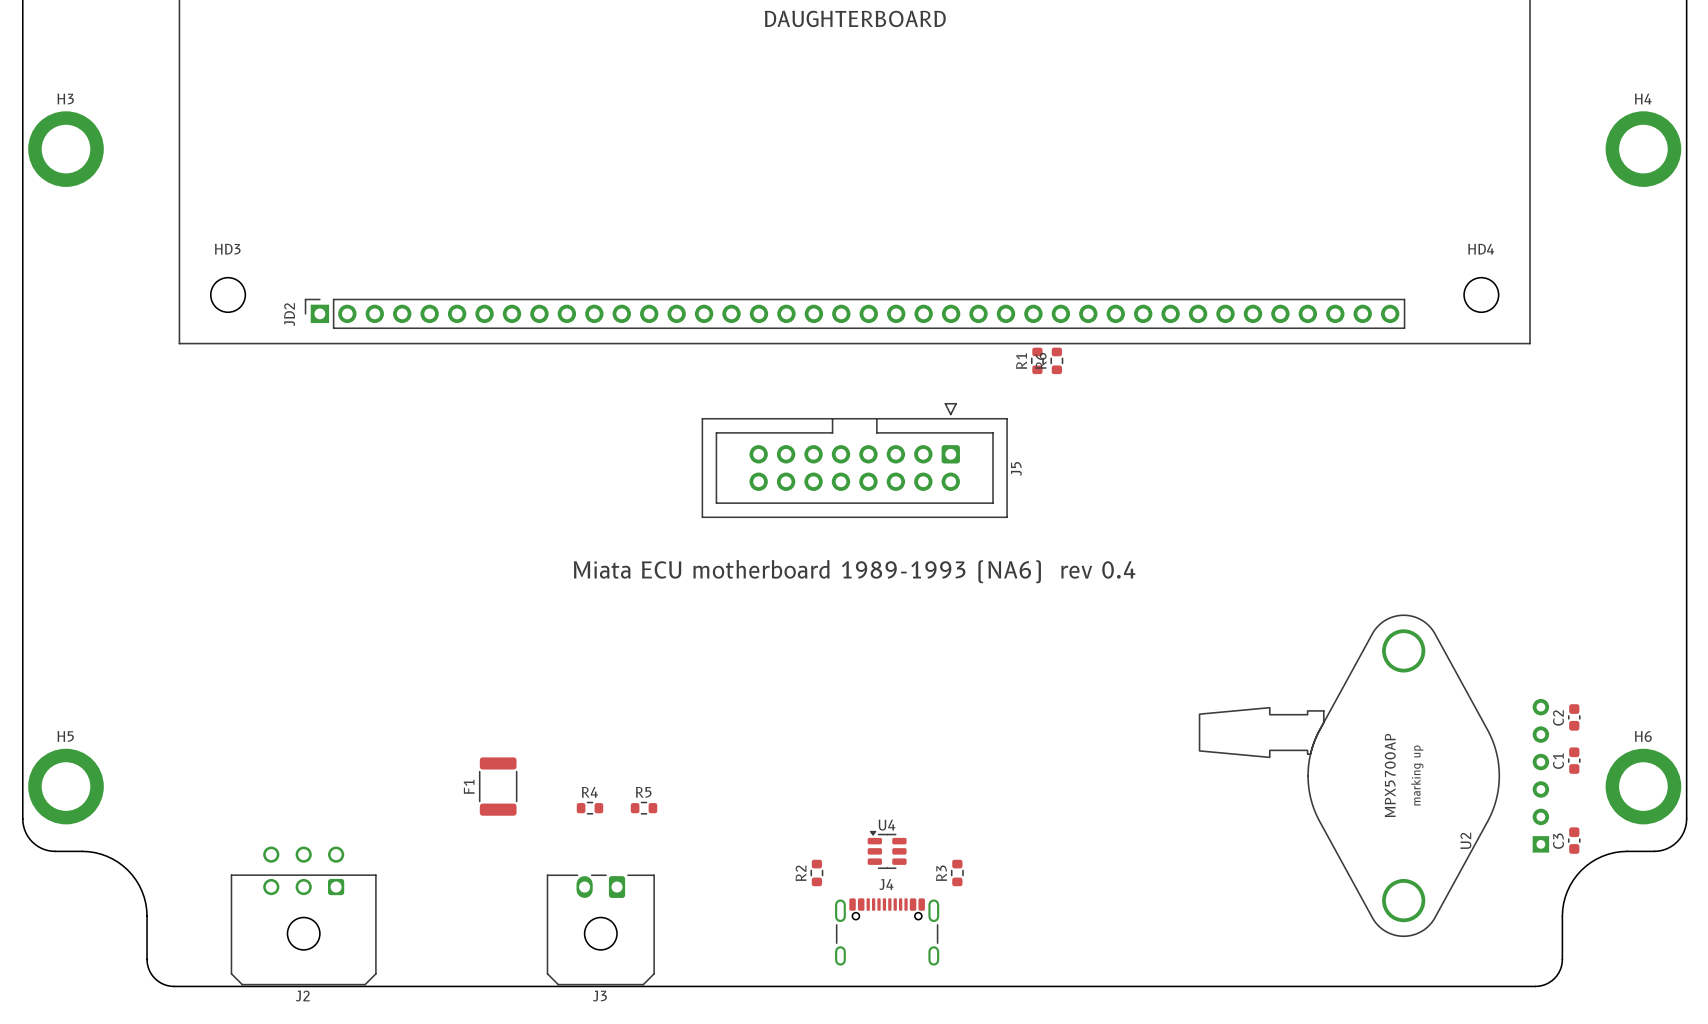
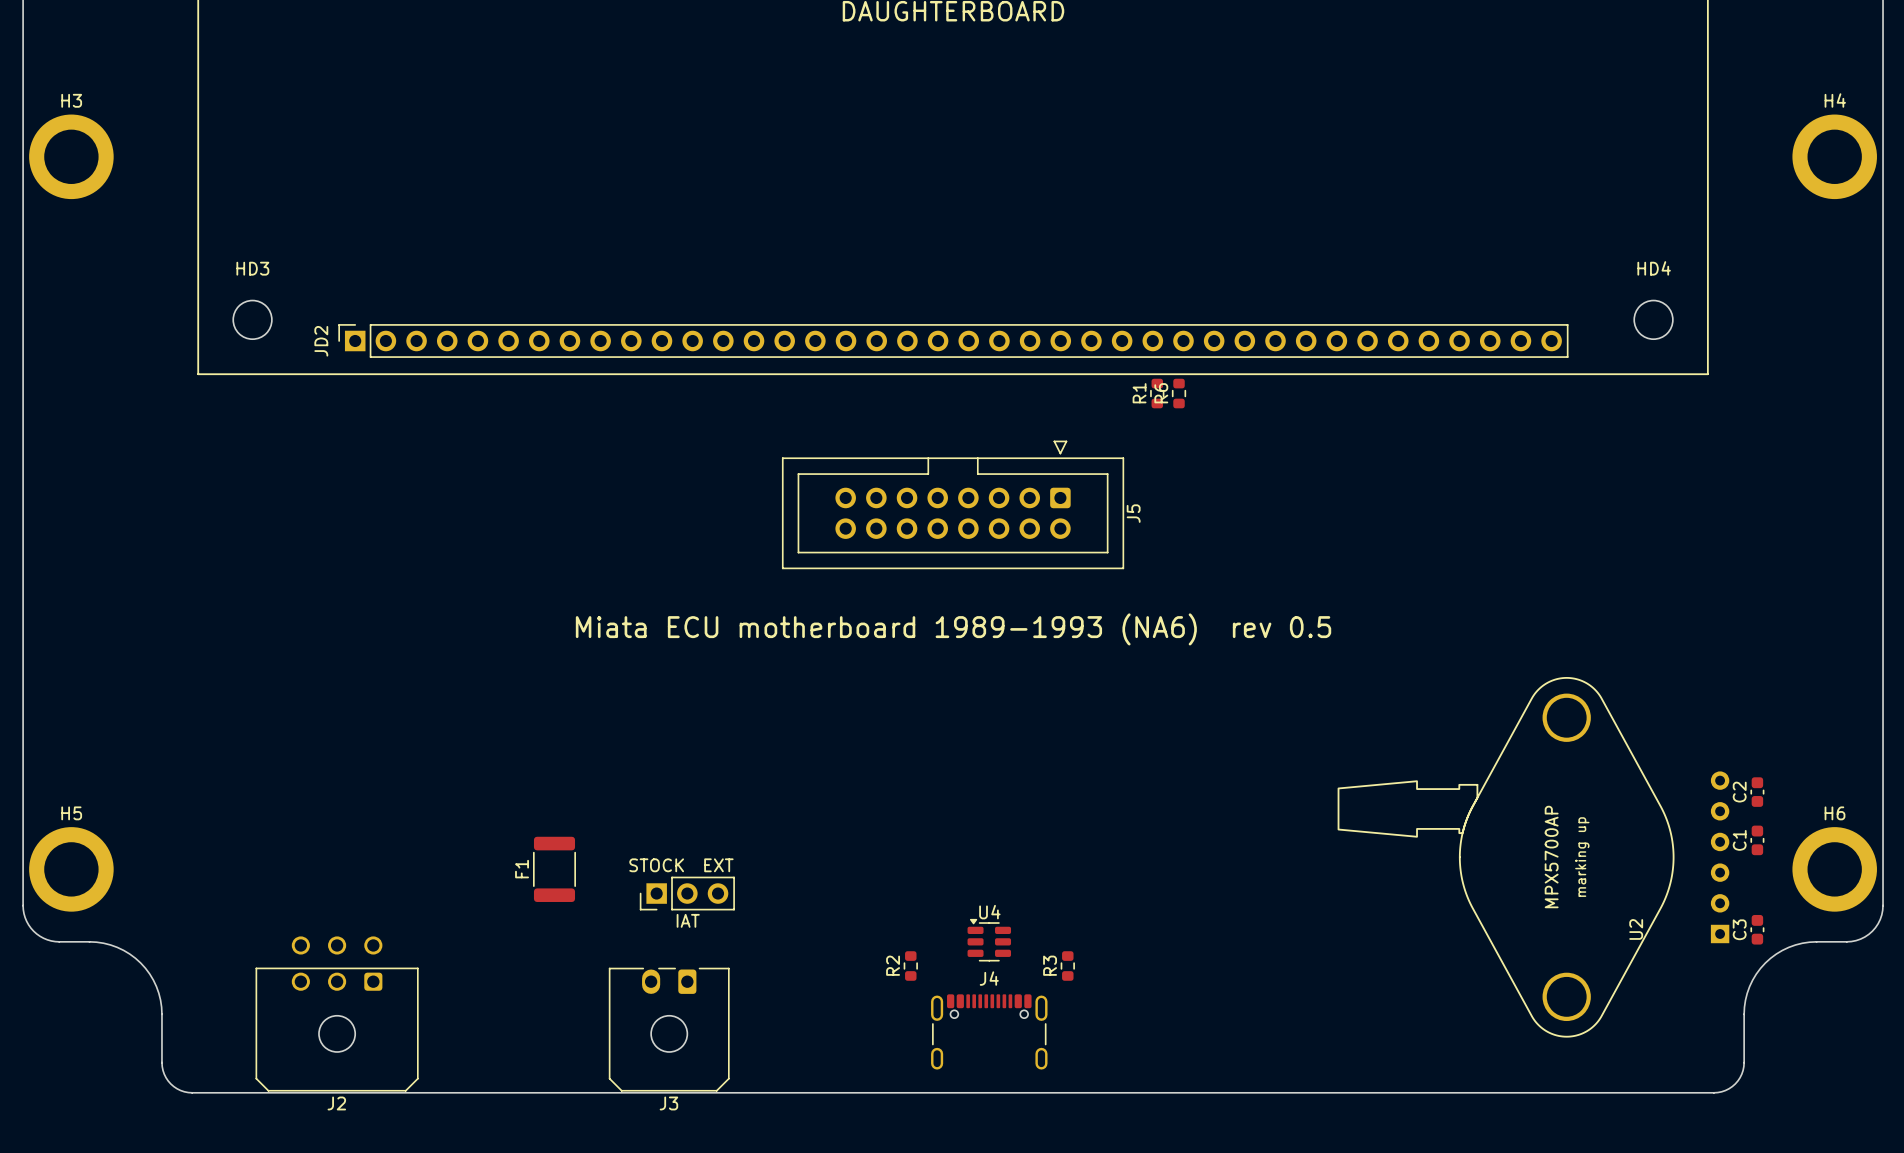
text: Miata ECU motherboard 1989-1993 (NA6) rev 0.4 (854, 571) -> Miata ECU motherboard 1989-1993 (NA6) rev 0.5 (953, 629)
text: none -> STOCK (656, 865)
text: none -> EXT (718, 865)
R4: (590, 808) -> none
part: none -> (687, 893)
R5: (644, 808) -> none
text: none -> IAT (688, 920)

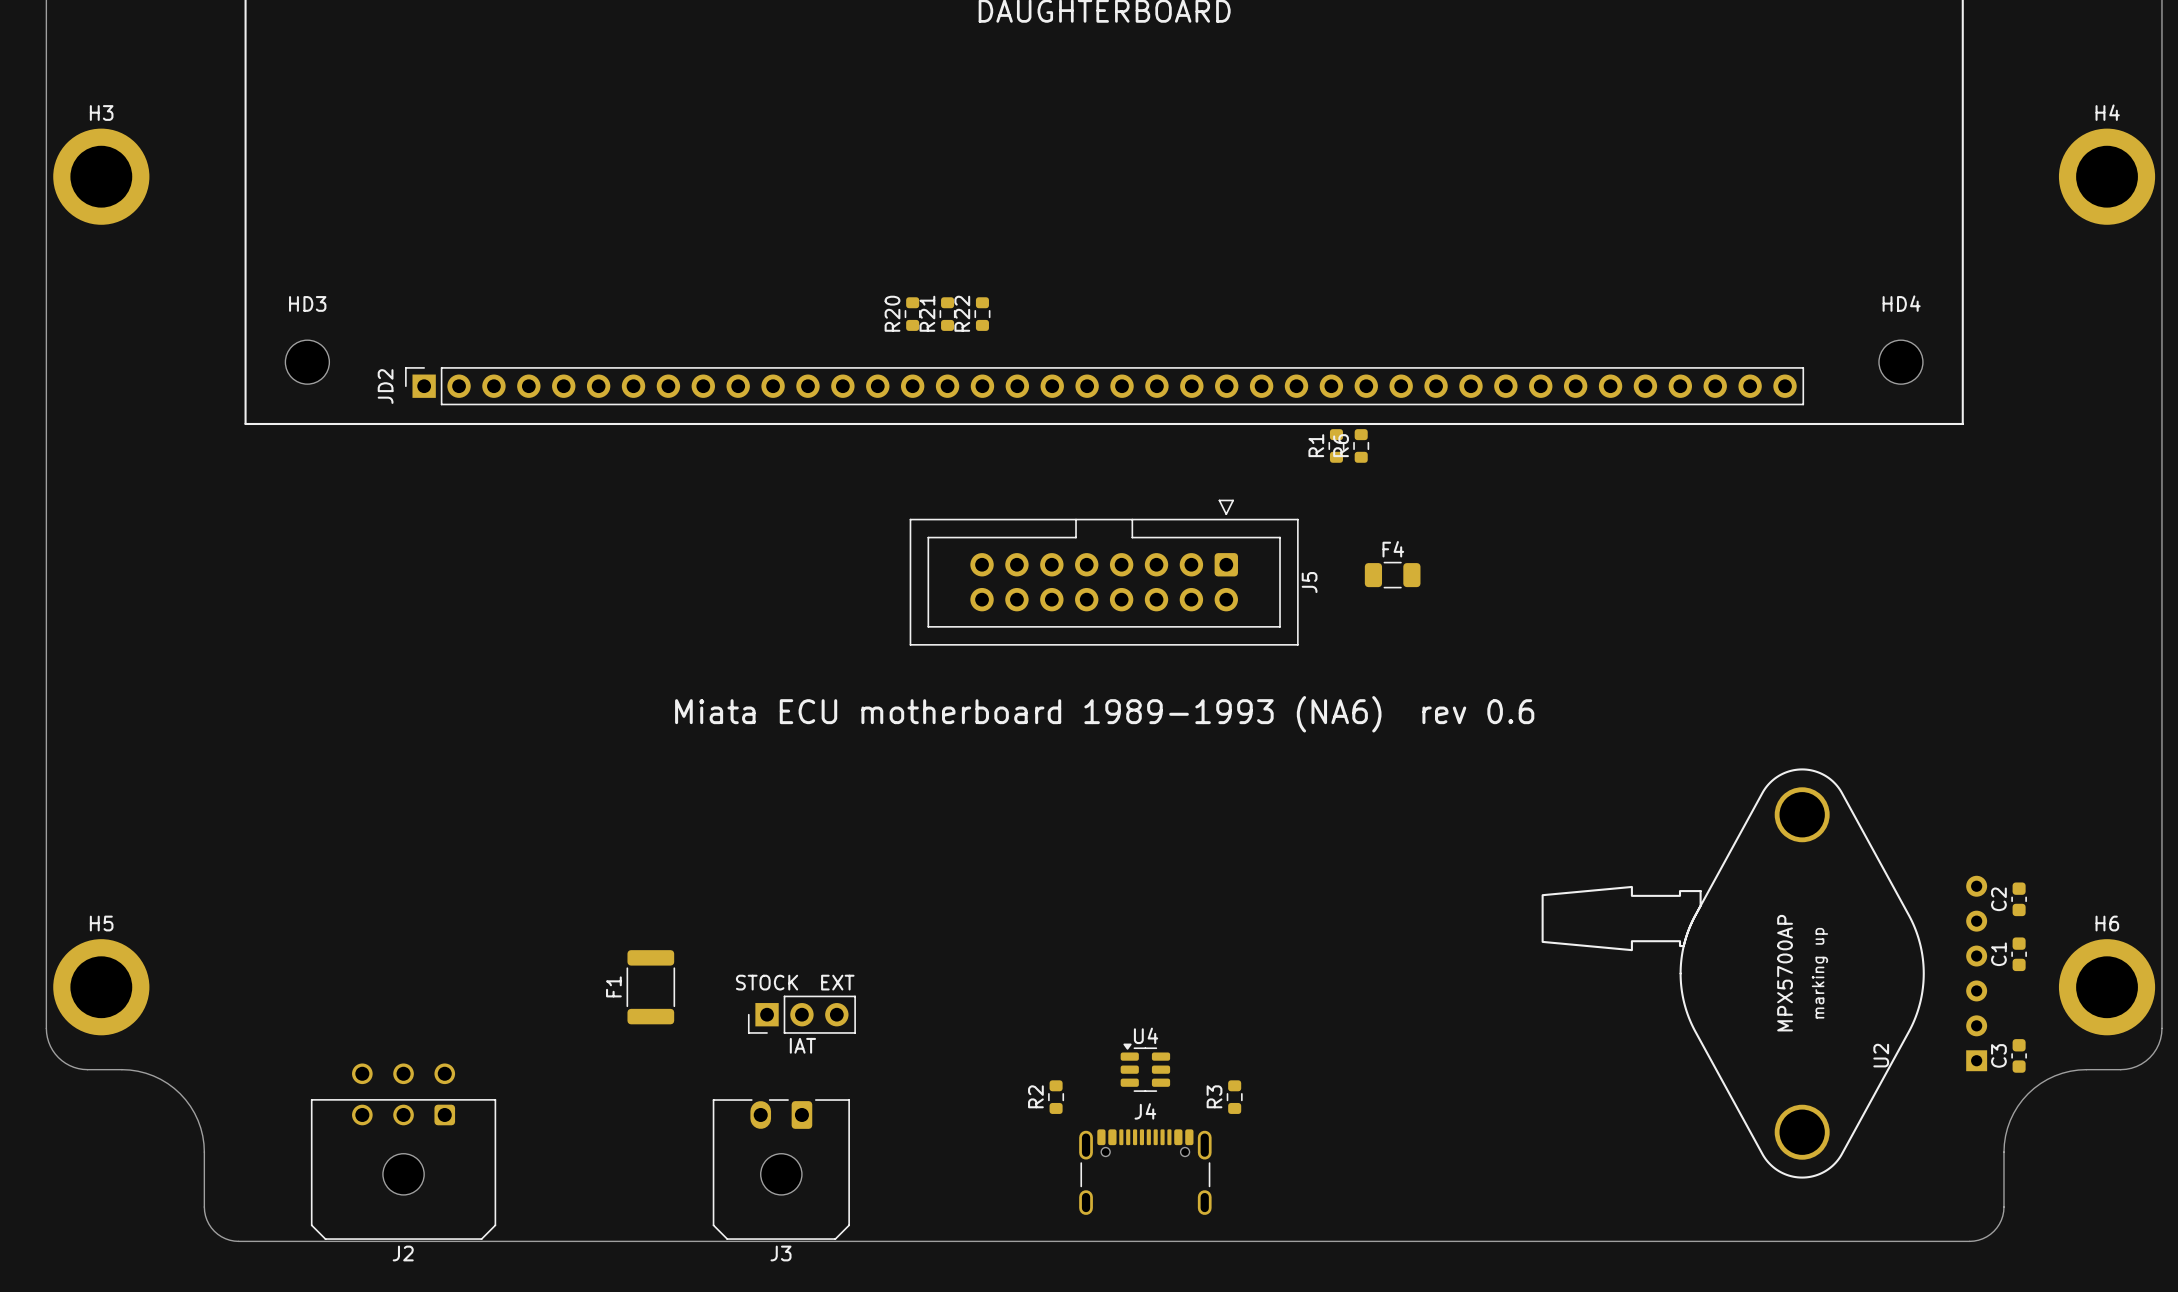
R20: none -> (912, 314)
R21: none -> (947, 314)
R22: none -> (982, 314)
F4: none -> (1392, 575)
text: Miata ECU motherboard 1989-1993 (NA6) rev 0.5 (953, 629) -> Miata ECU motherboard 1989-1993 (NA6) rev 0.6 (1104, 714)

